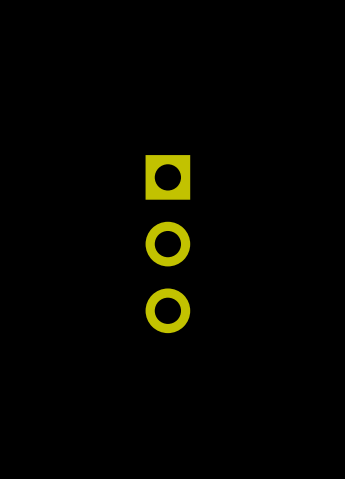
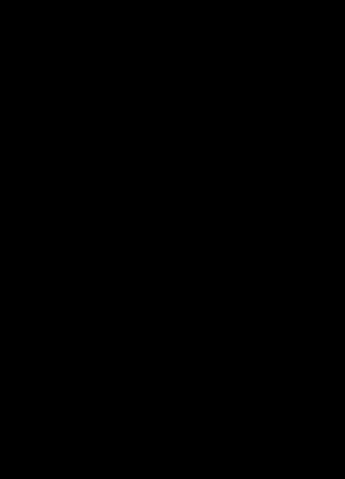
part: (167, 244) -> none

